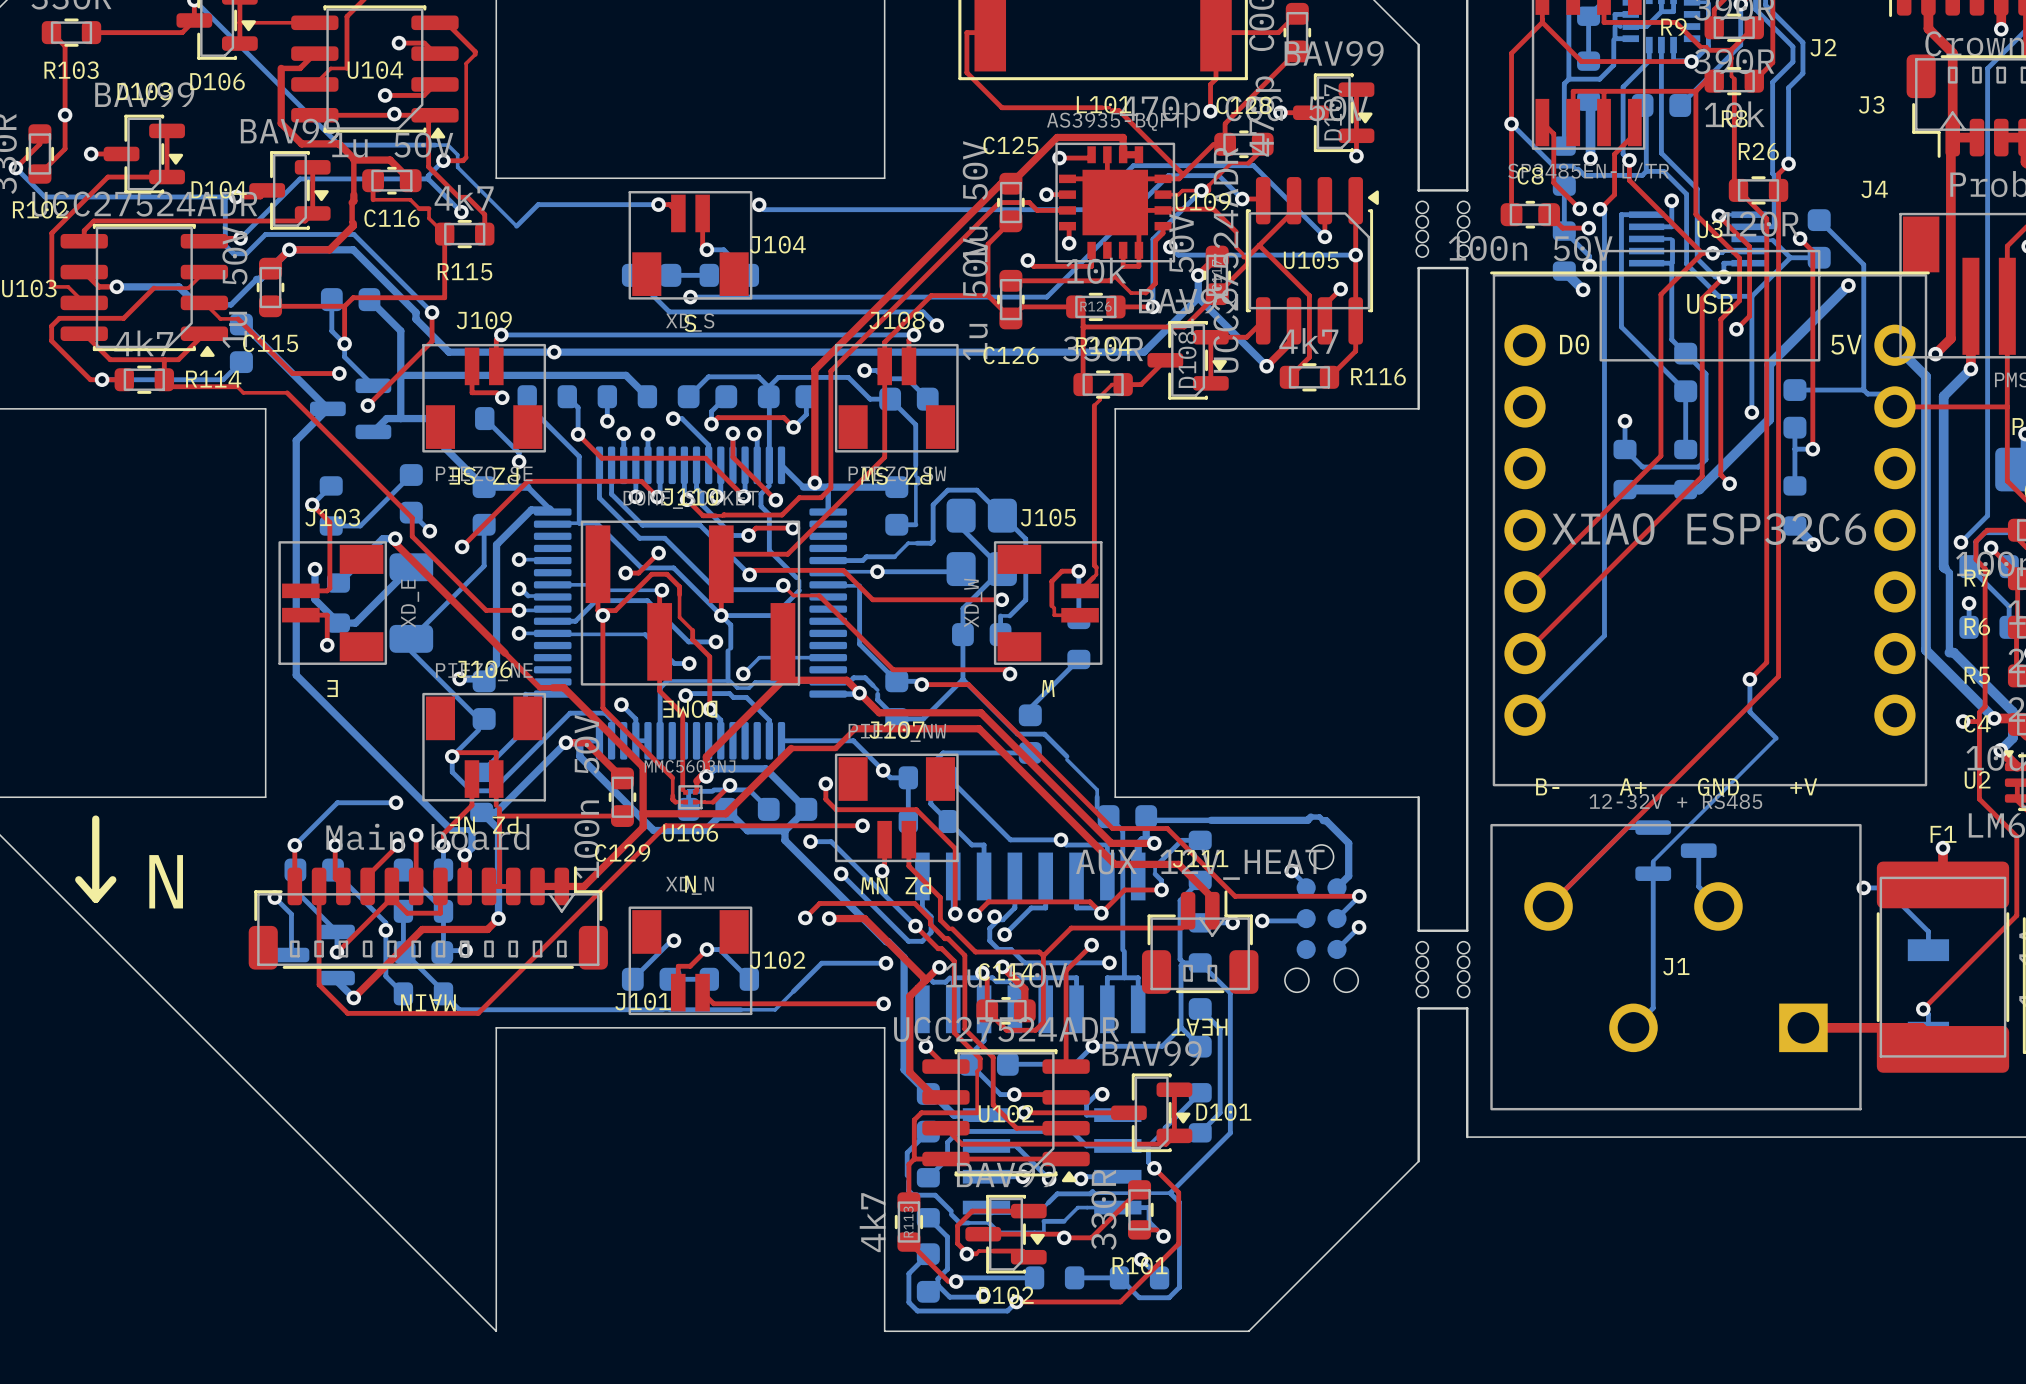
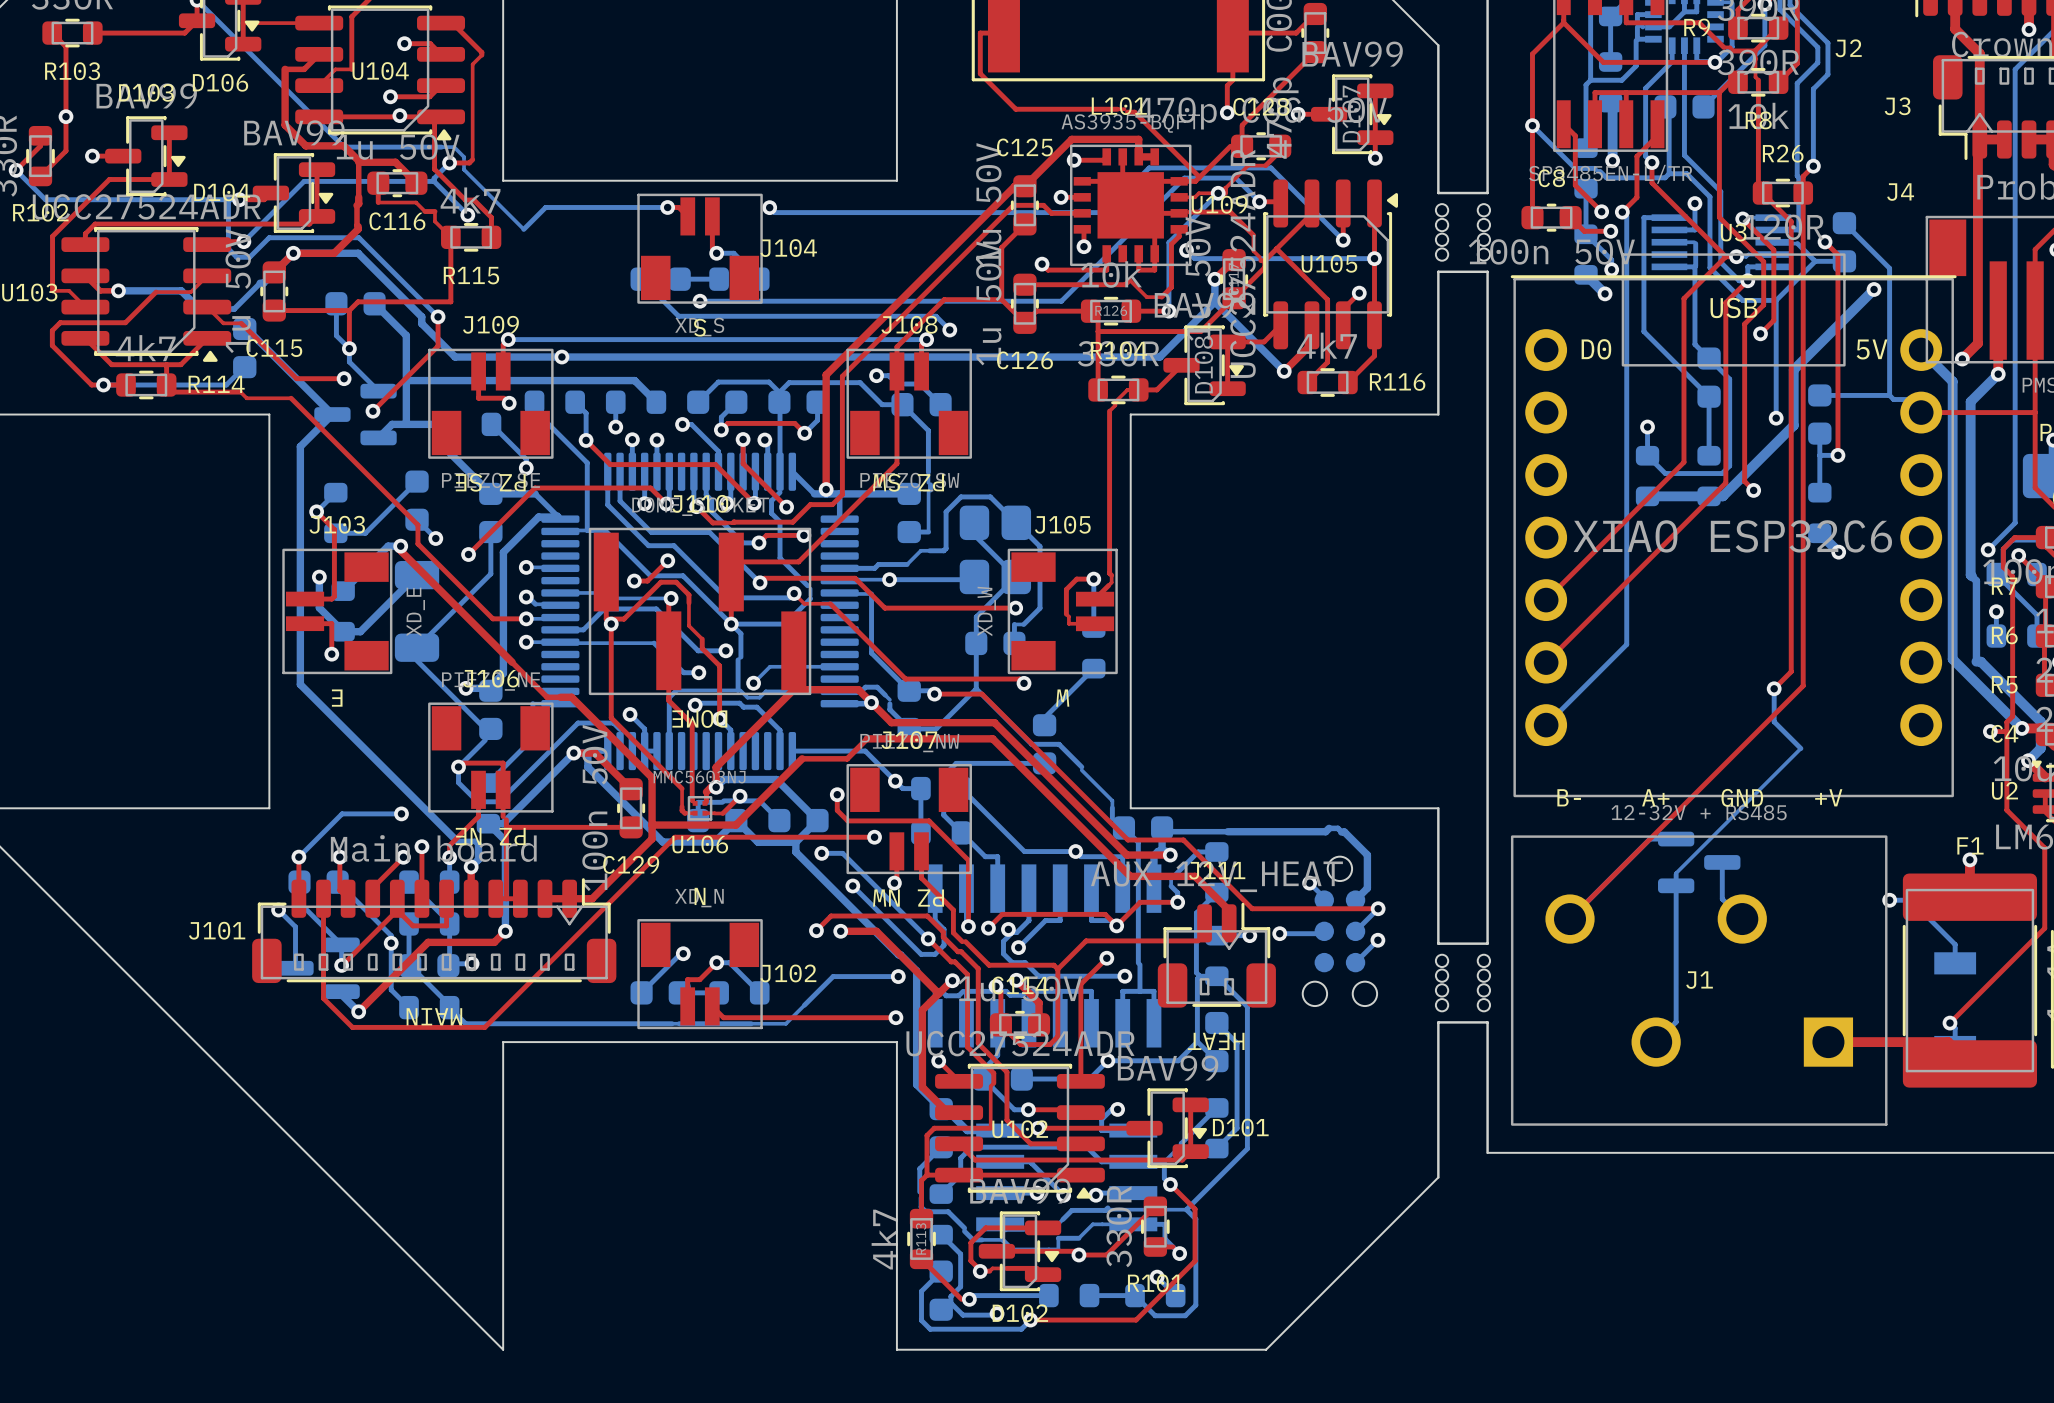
line: (95, 819) (95, 899) -> none
line: (78, 879) (95, 899) -> none
line: (112, 879) (95, 899) -> none
text: N (166, 881) -> none
J101 name position: J101 (643, 1001) -> J101 (217, 930)

